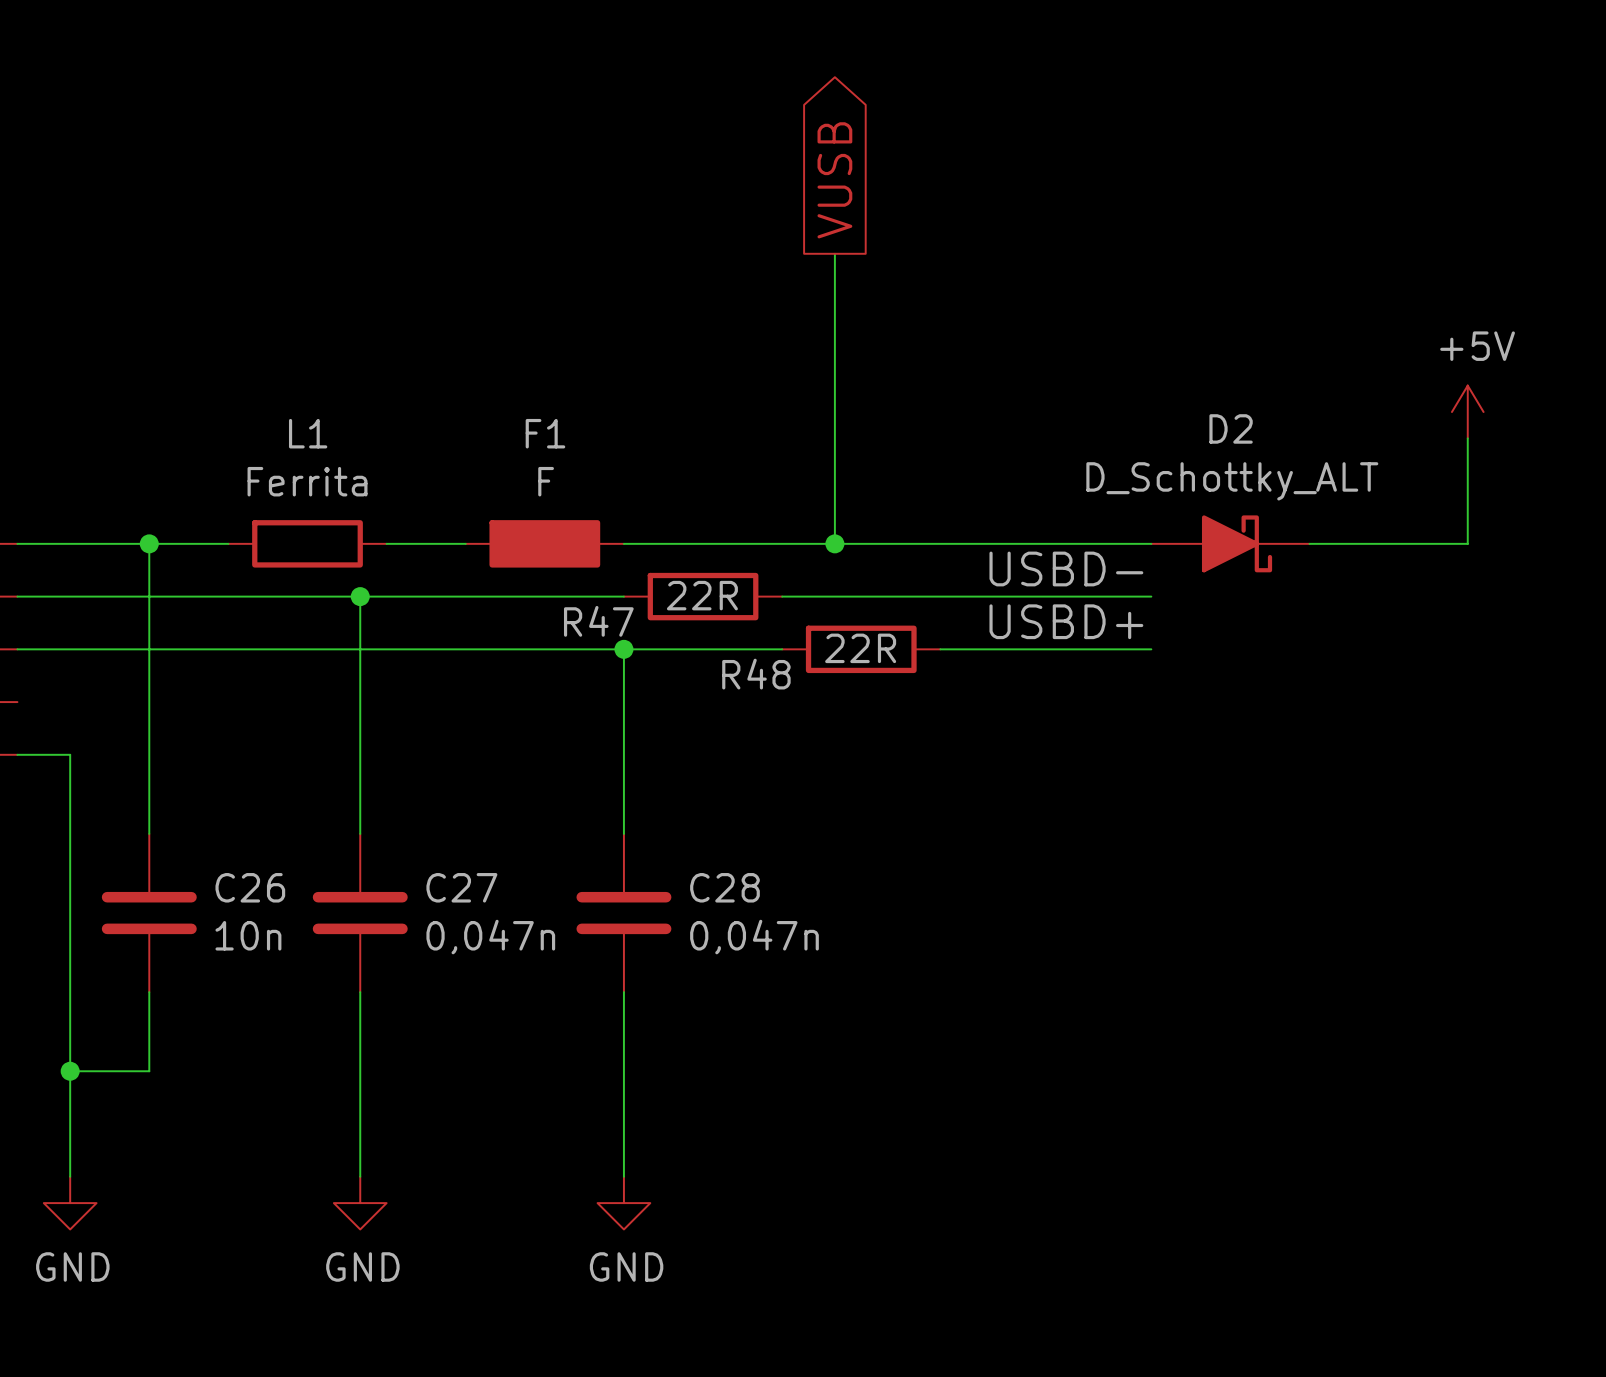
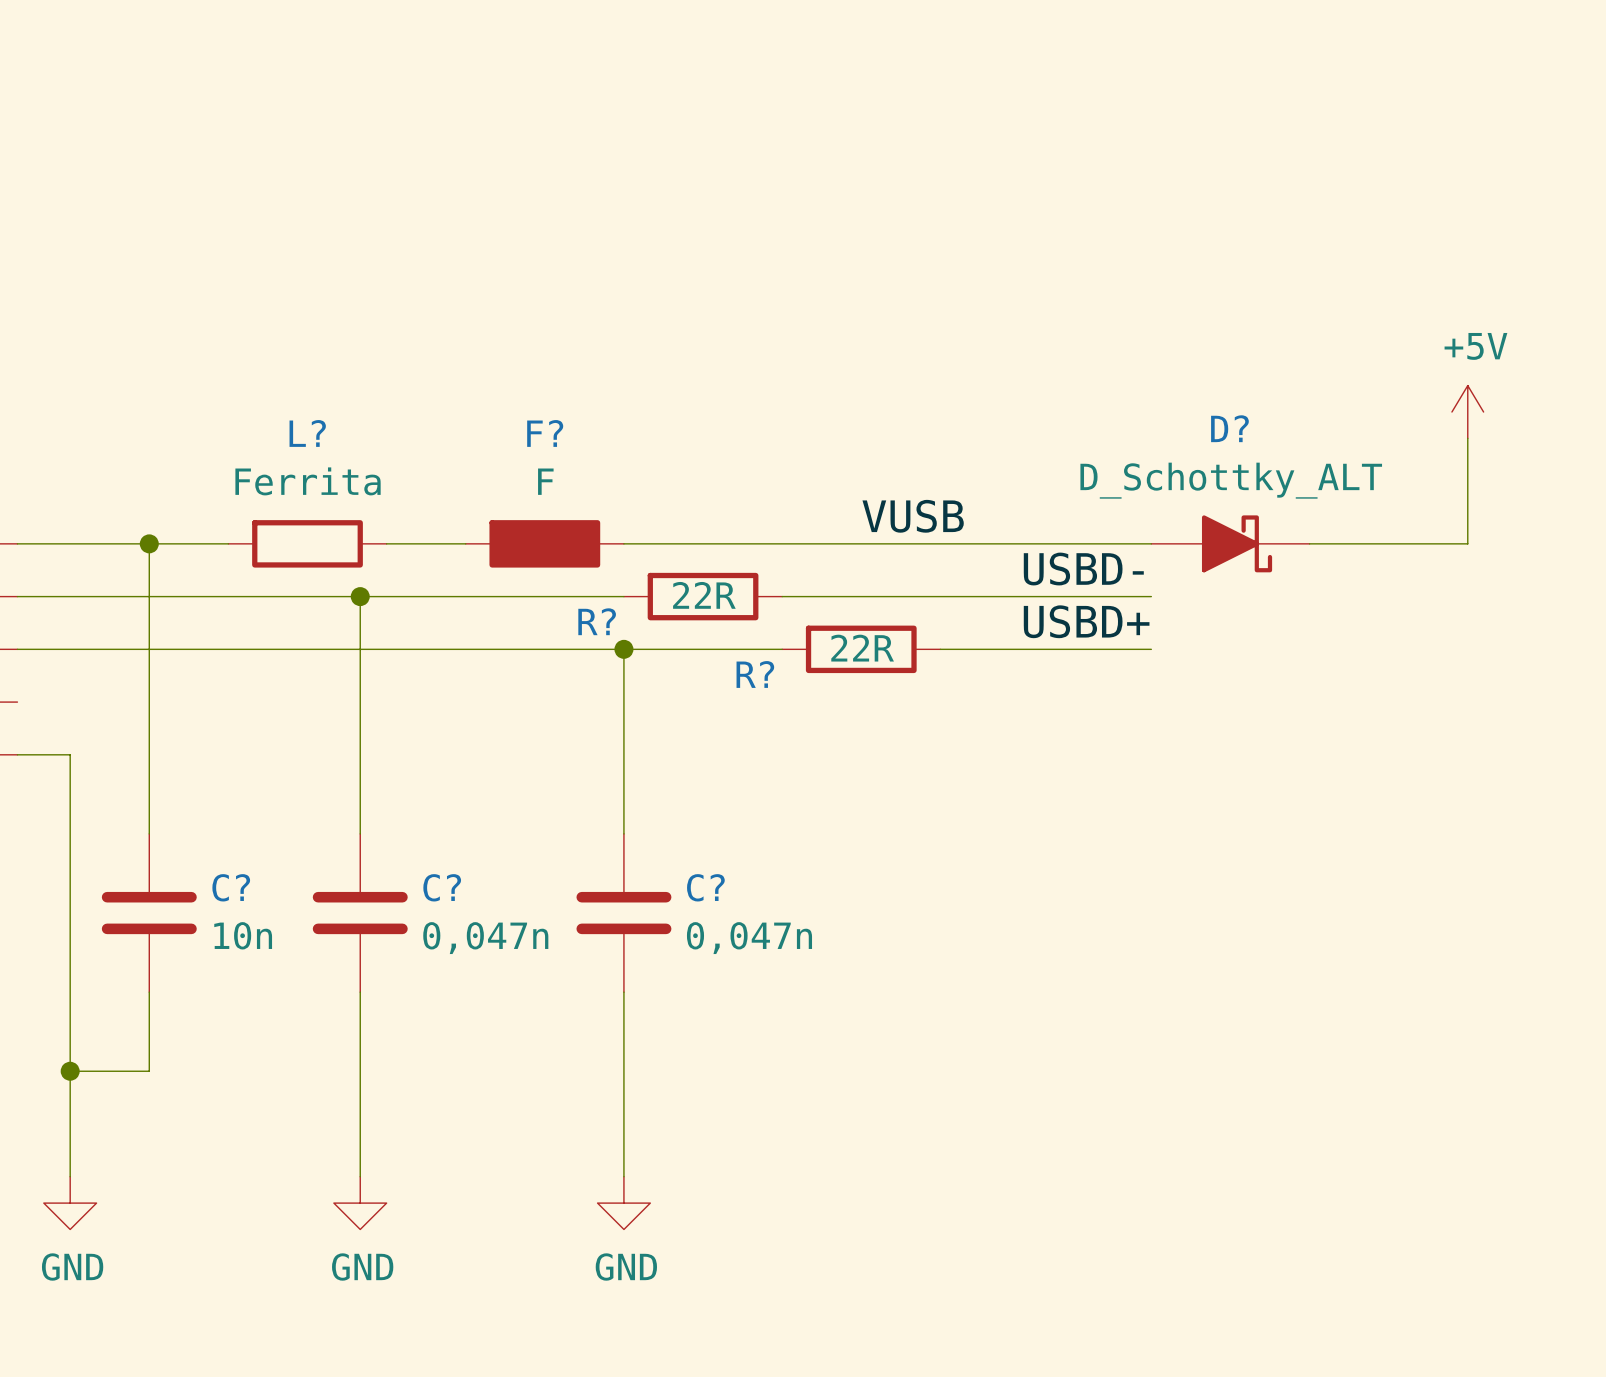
global label: VUSB (834, 180) -> none
wire: (834, 253) (834, 543) -> none
D2 name: D2 (1231, 428) -> D? (1229, 428)
L1 name: L1 (308, 433) -> L? (307, 433)
F1 name: F1 (545, 433) -> F? (545, 433)
label: none -> VUSB (913, 516)
junction: (834, 543) -> none
R47 name: R47 (598, 621) -> R? (597, 621)
R48 name: R48 (756, 674) -> R? (755, 674)
C26 name: C26 (250, 887) -> C? (231, 887)
C27 name: C27 (461, 887) -> C? (442, 887)
C28 name: C28 (724, 887) -> C? (705, 887)

